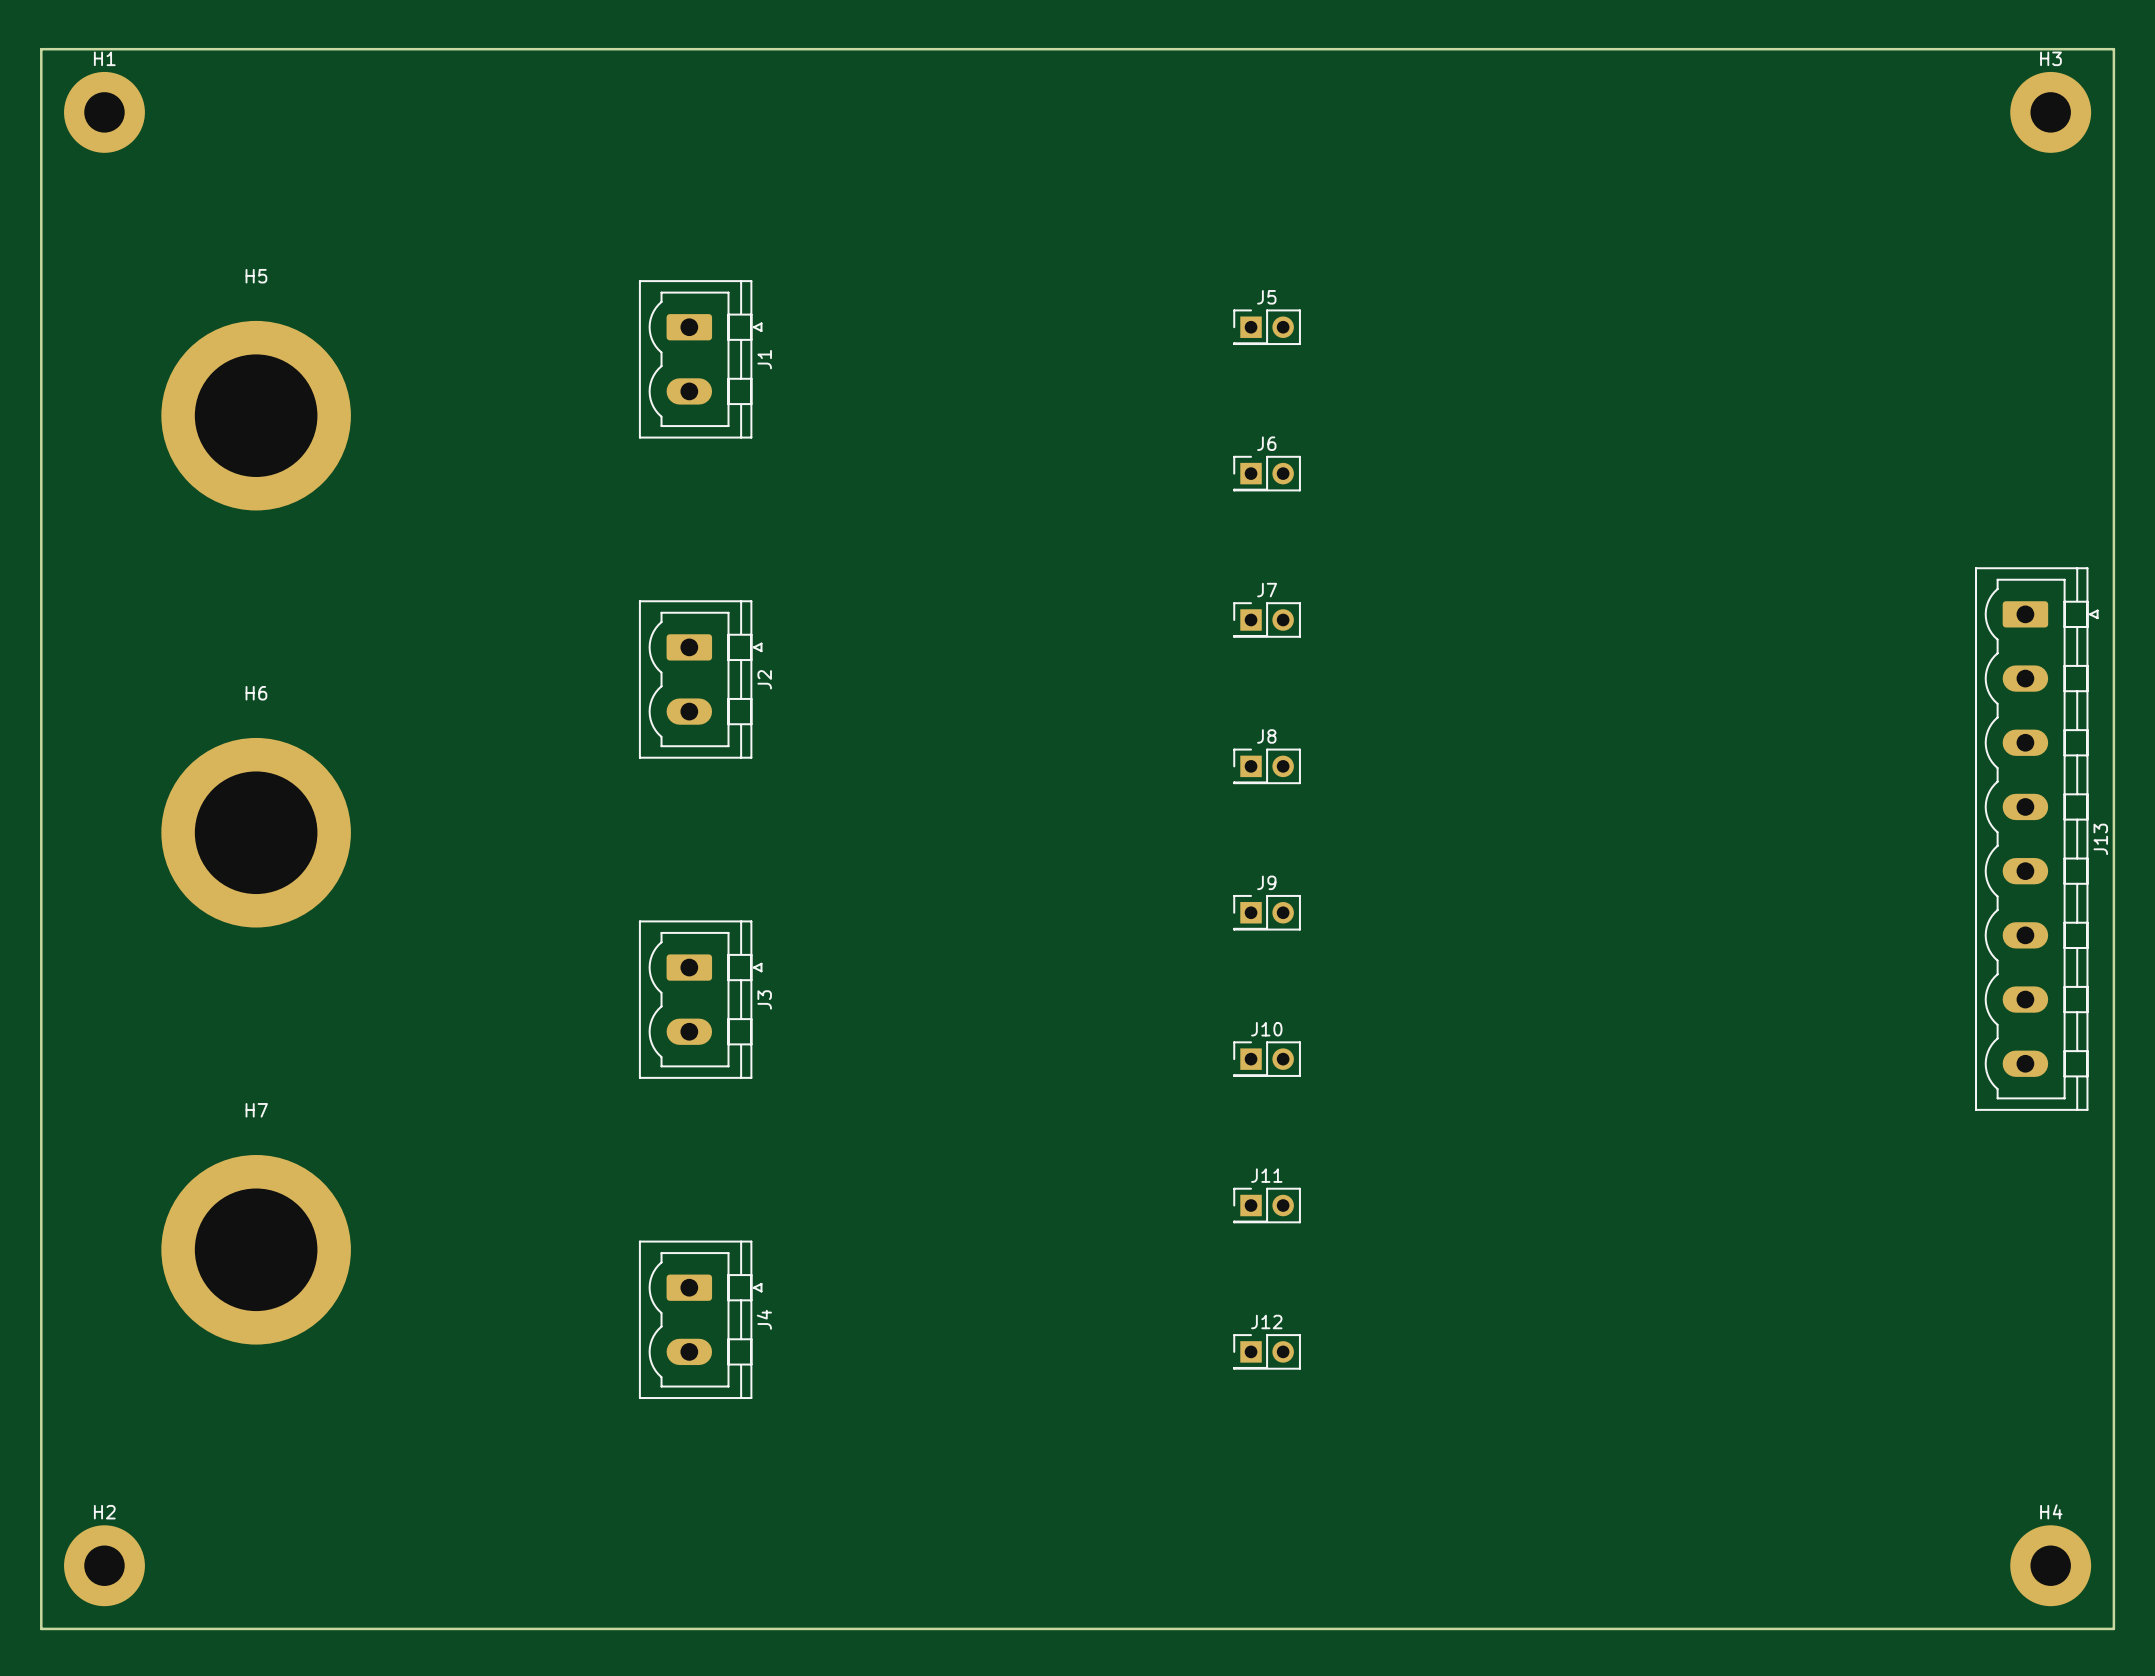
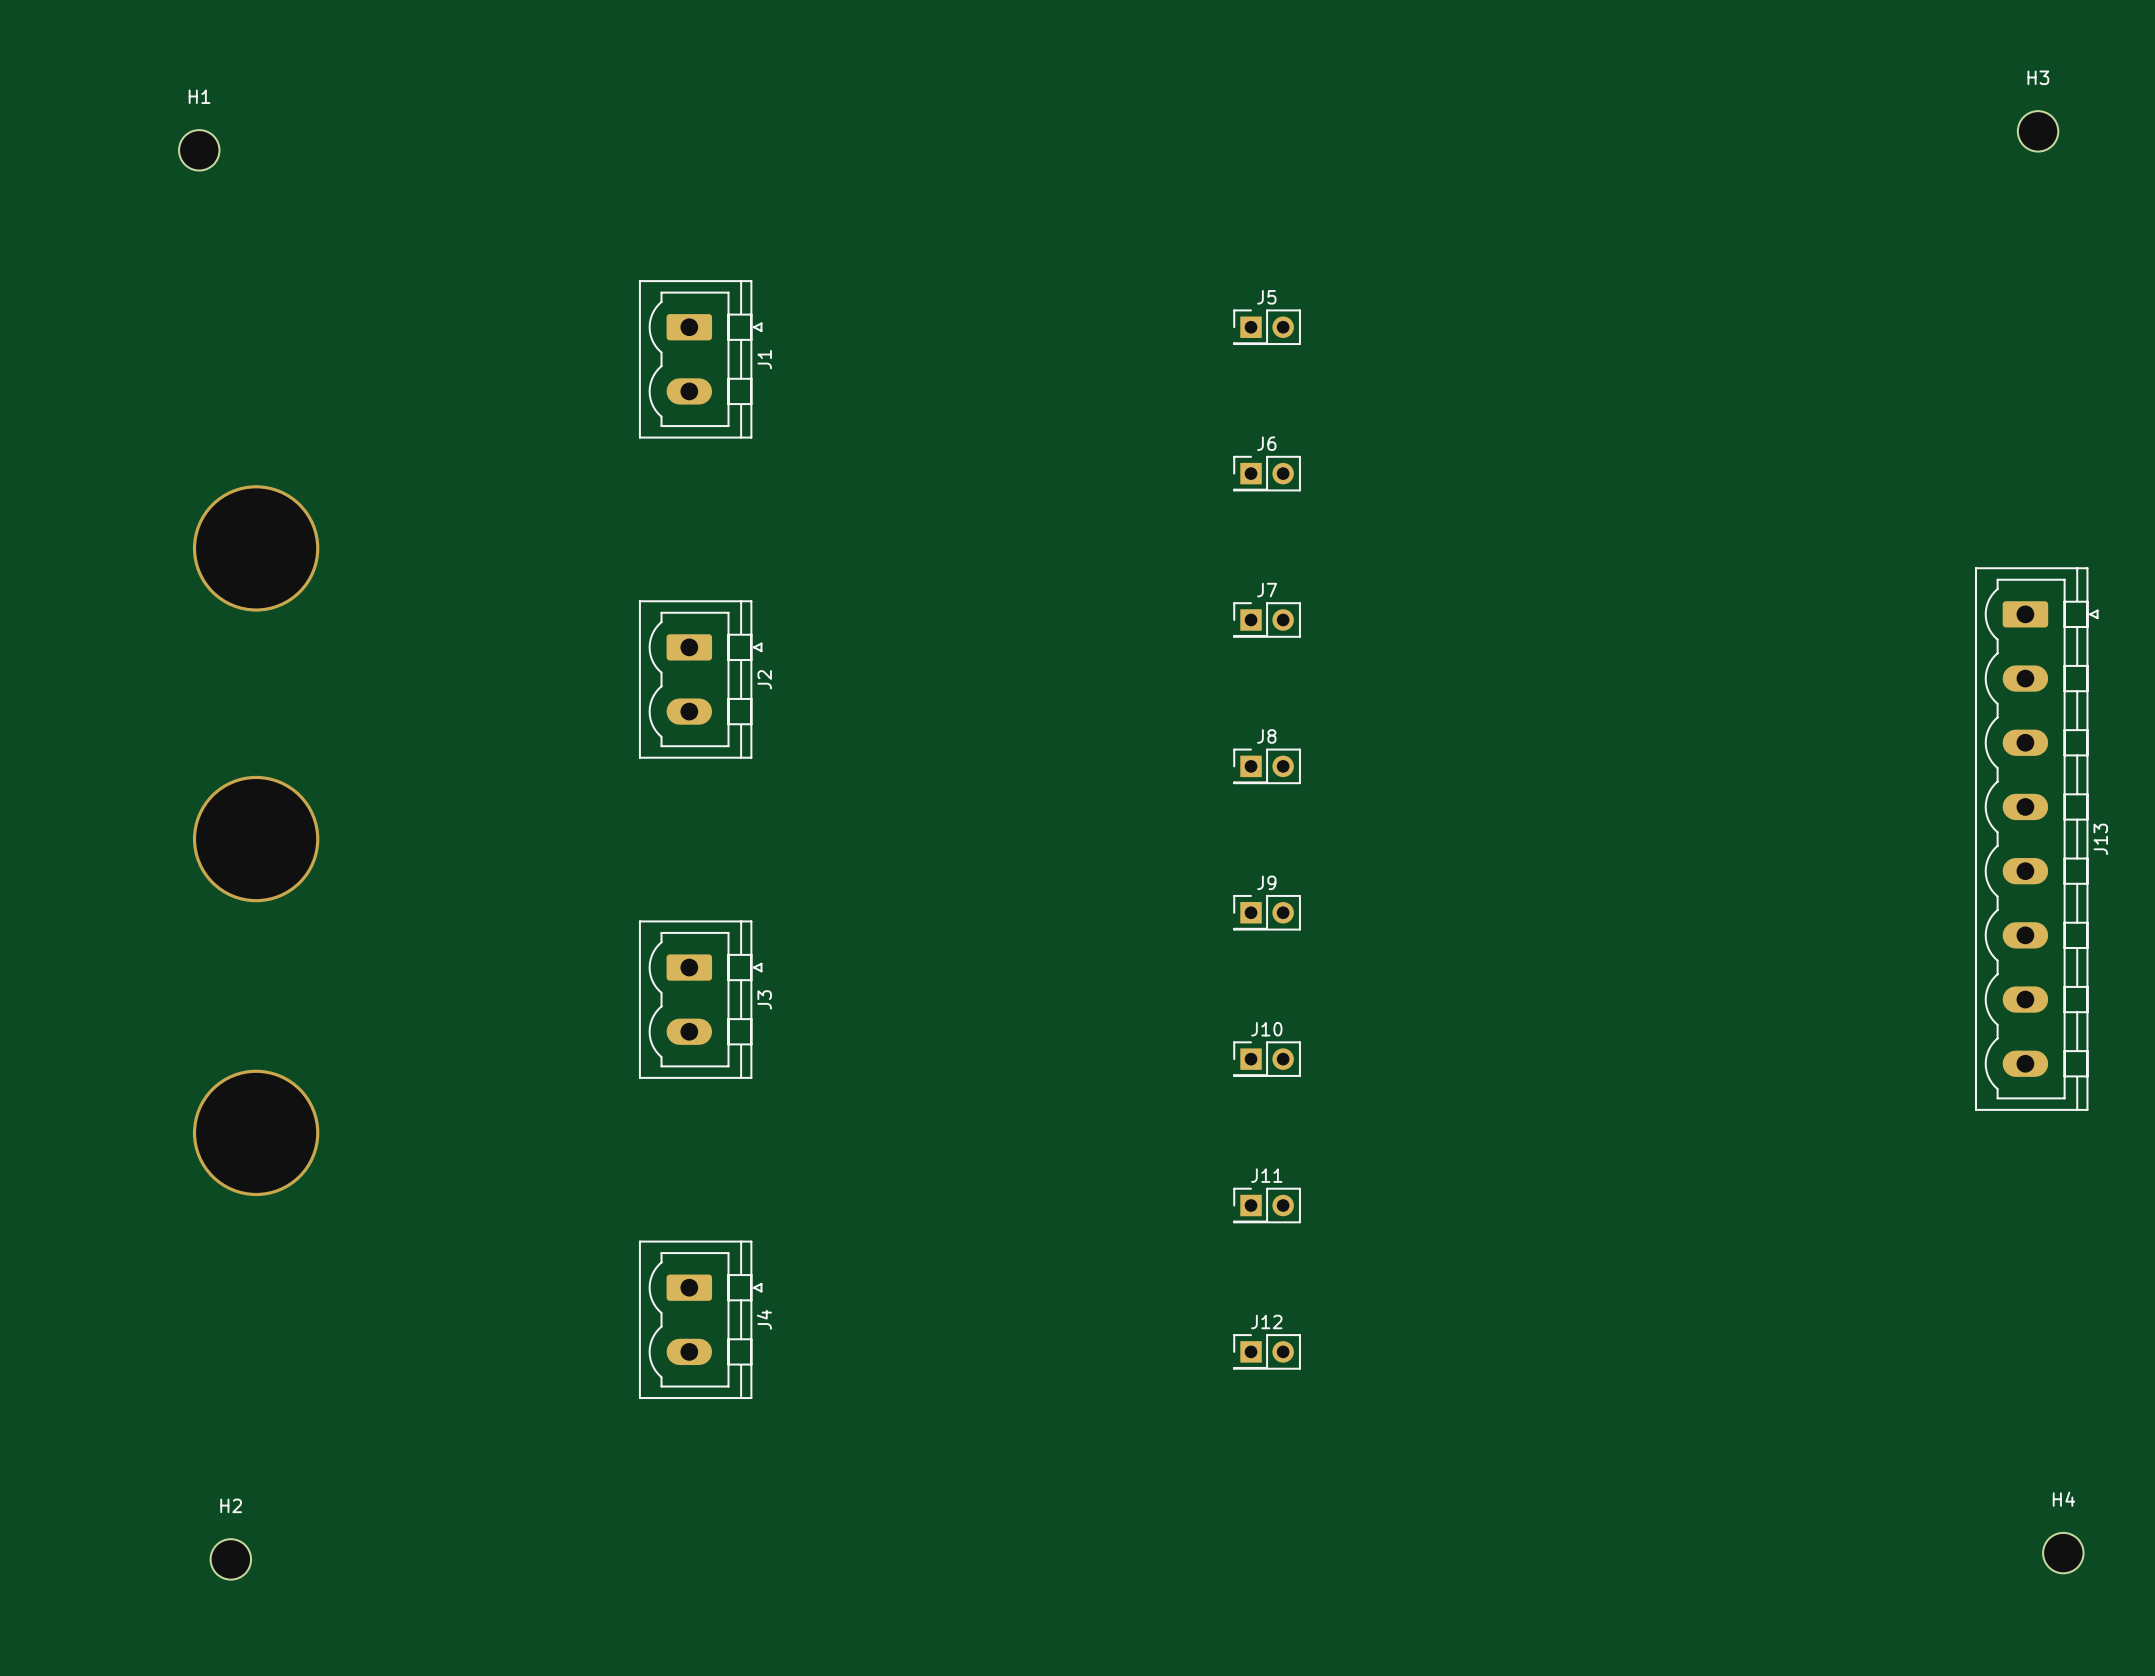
board edge: (41, 49) (2113, 49) (2113, 1628) (41, 1628) (41, 49) -> none
H1 footprint: [64, 71, 145, 153] -> [179, 130, 220, 171]
H3 footprint: [2010, 71, 2092, 153] -> [2017, 111, 2059, 152]
H5: (256, 415) -> none
via: none -> (256, 548)
H6: (256, 832) -> none
via: none -> (256, 839)
via: none -> (256, 1132)
H7: (256, 1249) -> none
H2 footprint: [64, 1525, 145, 1607] -> [210, 1539, 252, 1580]
H4 footprint: [2010, 1525, 2092, 1607] -> [2043, 1532, 2084, 1574]

